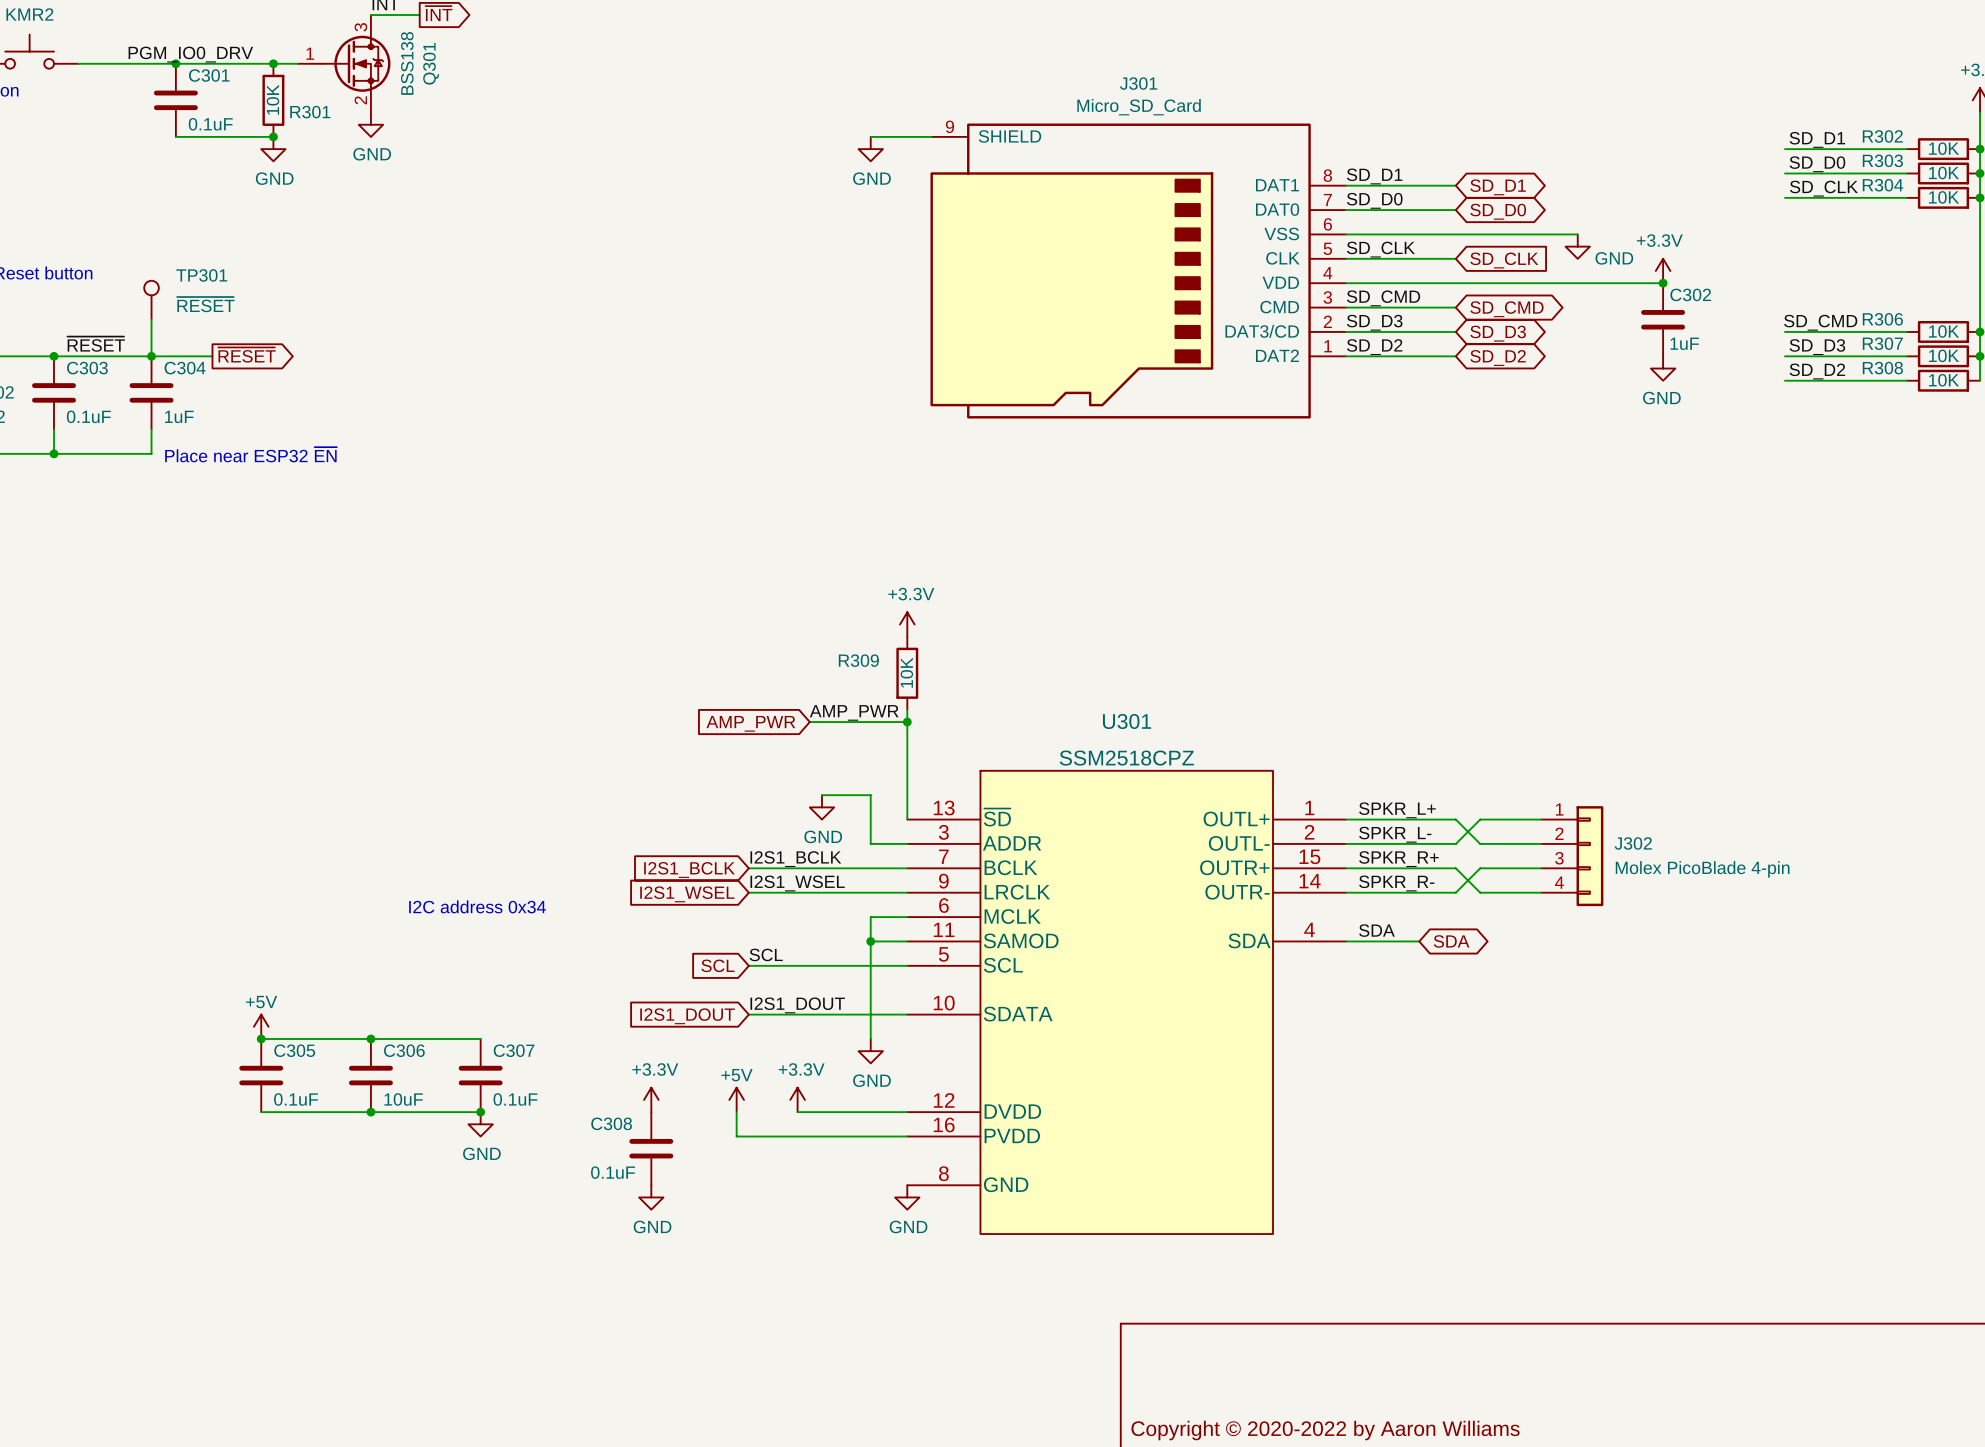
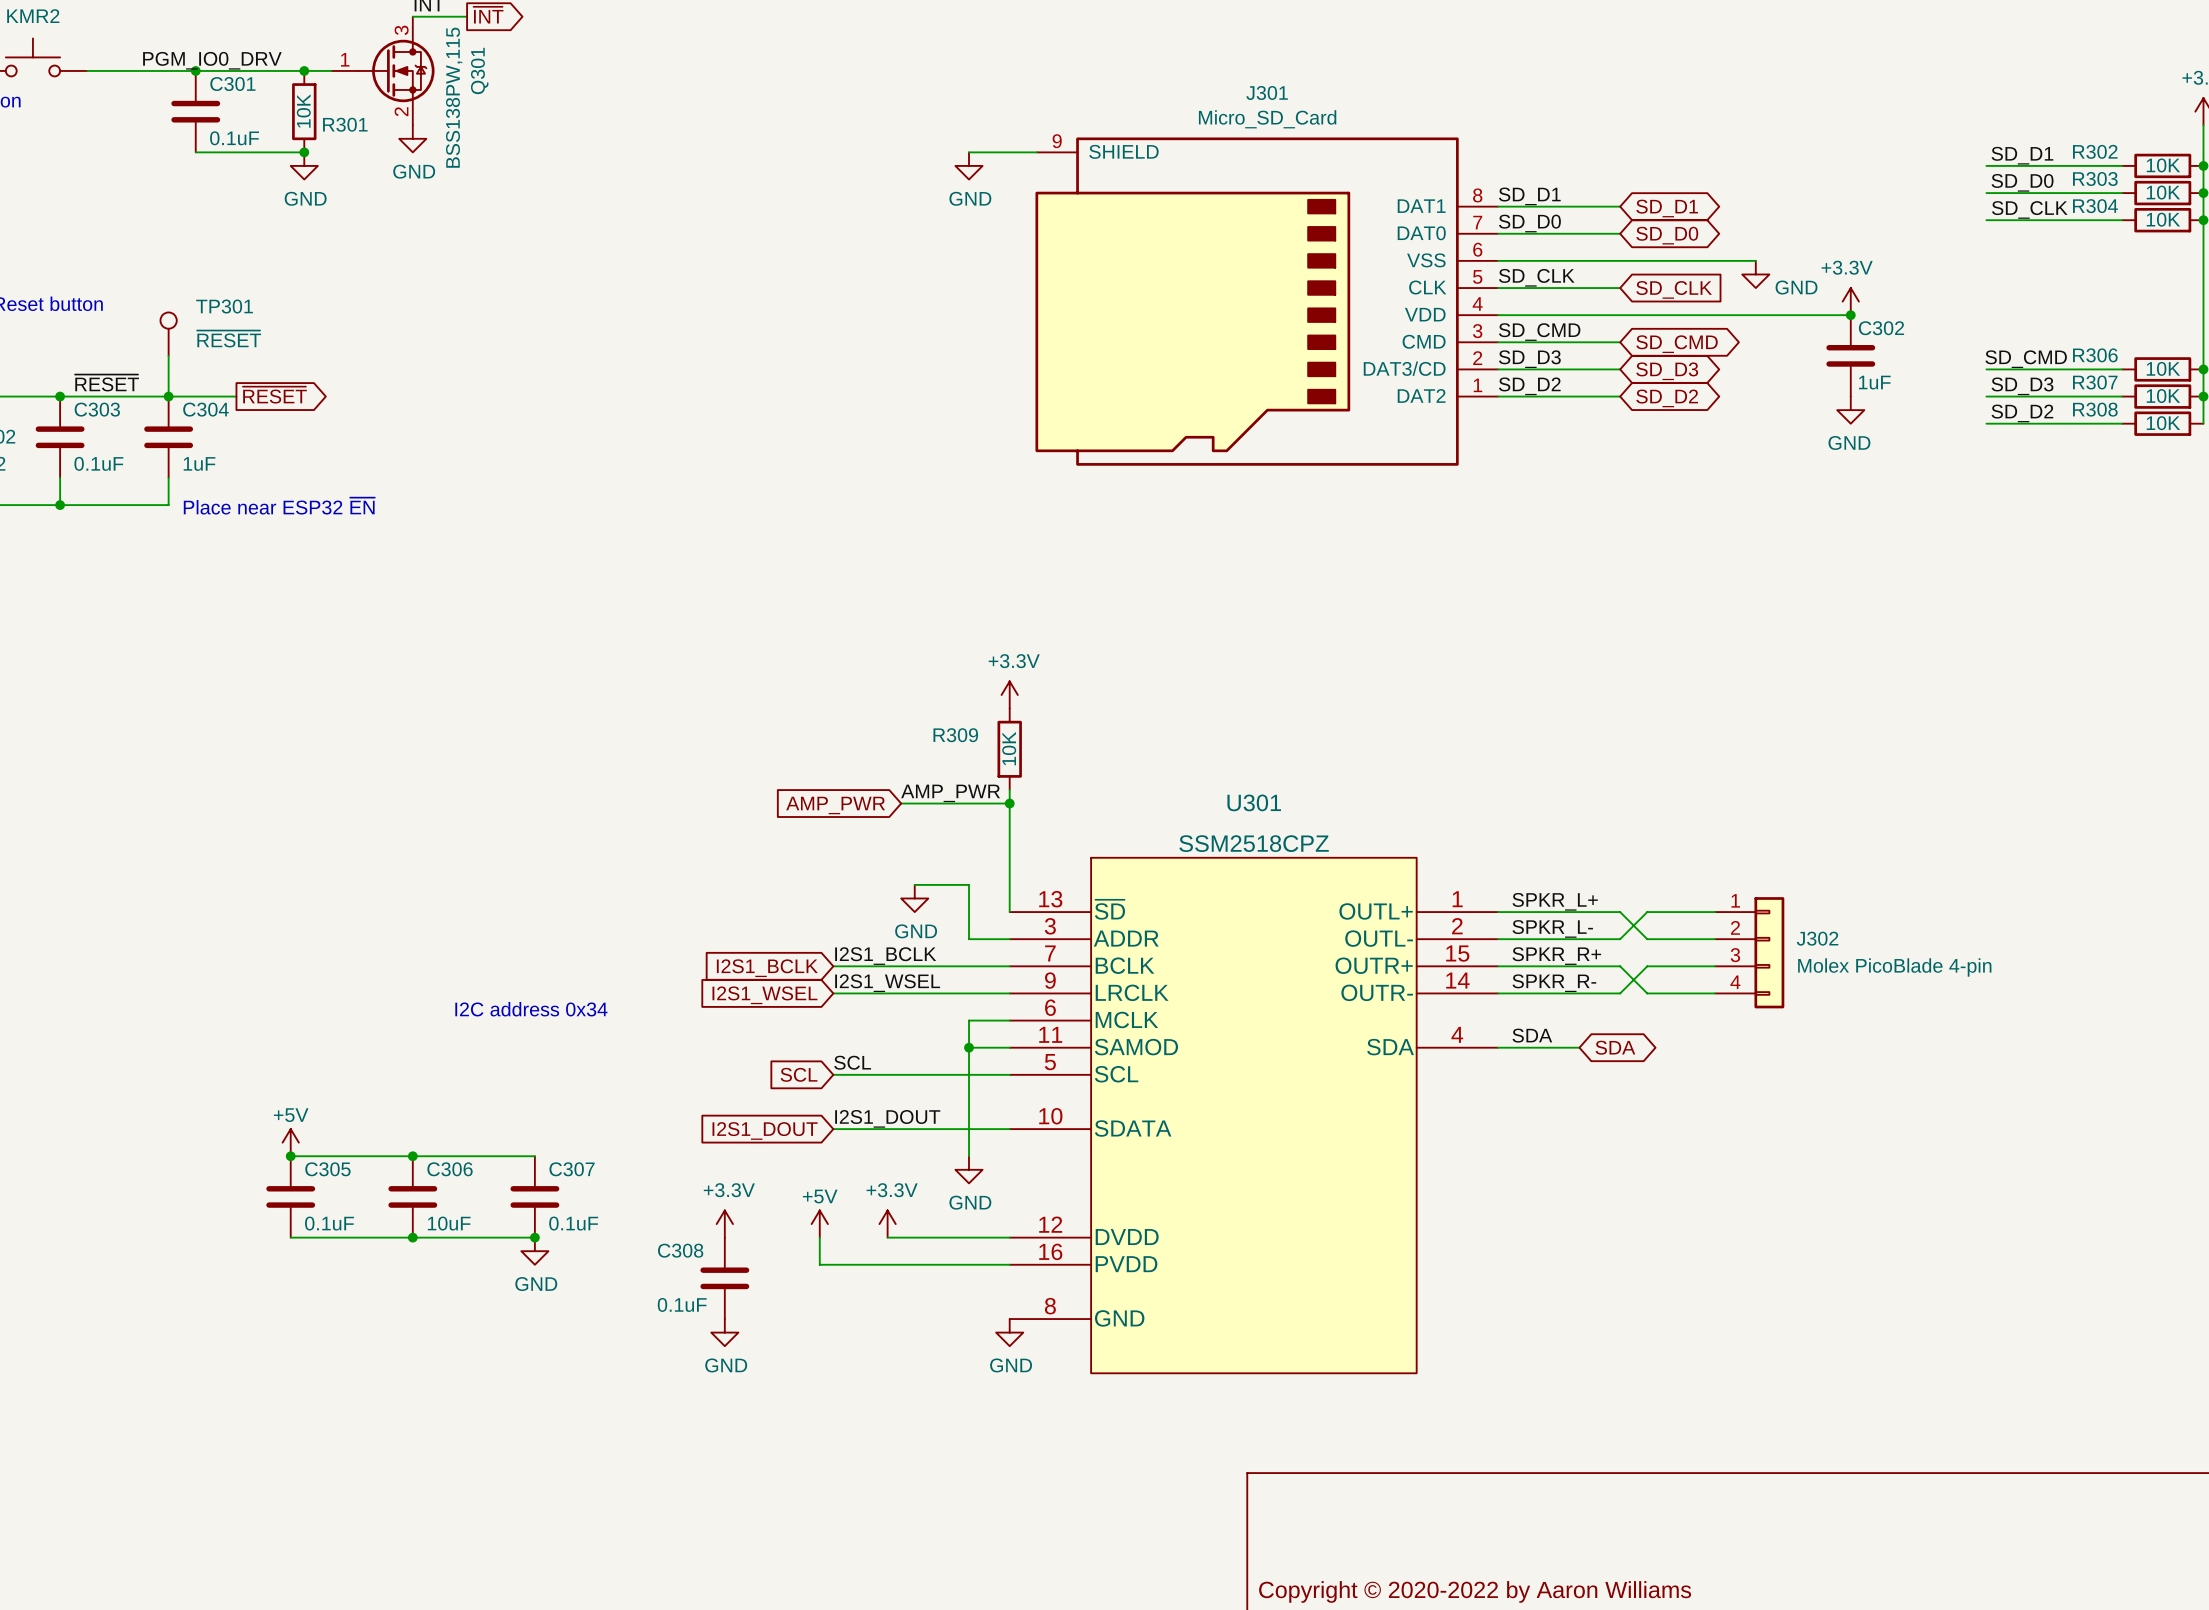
Q301 value: BSS138 (407, 63) -> BSS138PW,115 (454, 97)

